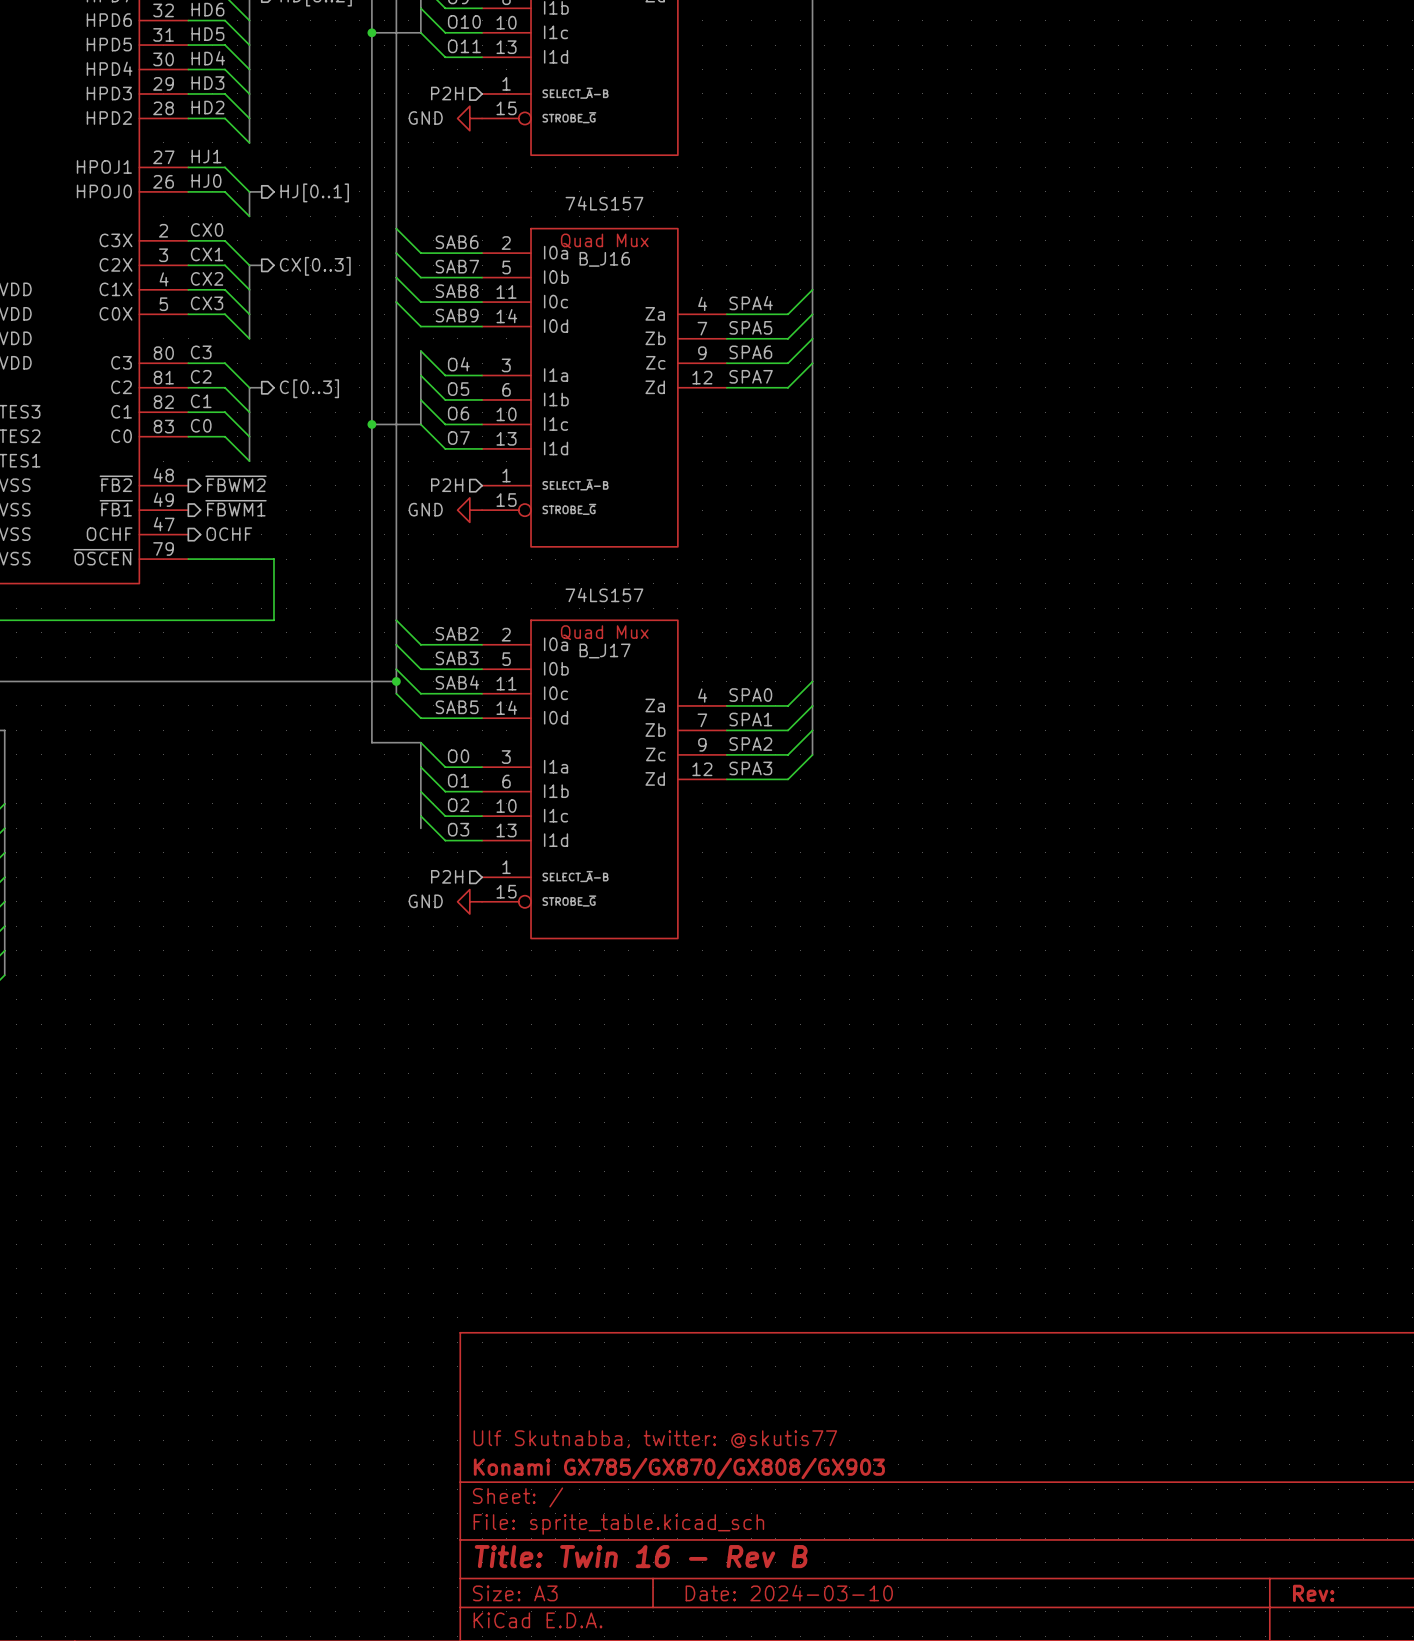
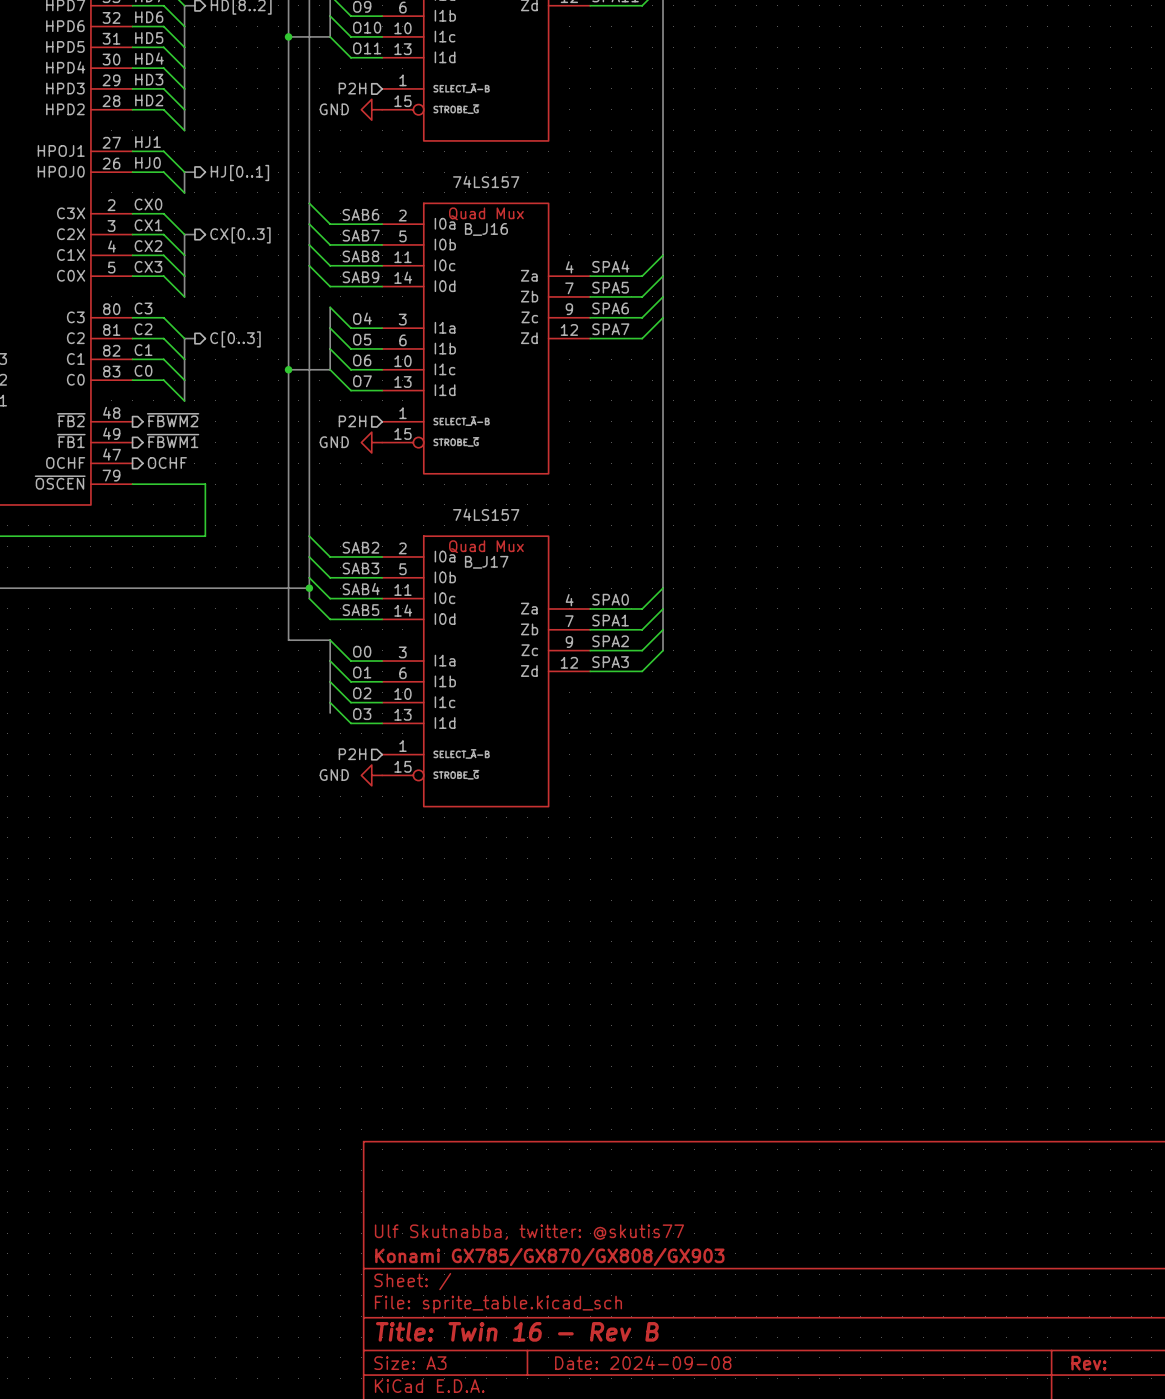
title block: Date: 2024-03-10 (789, 1593) -> Date: 2024-09-08 (643, 1362)

